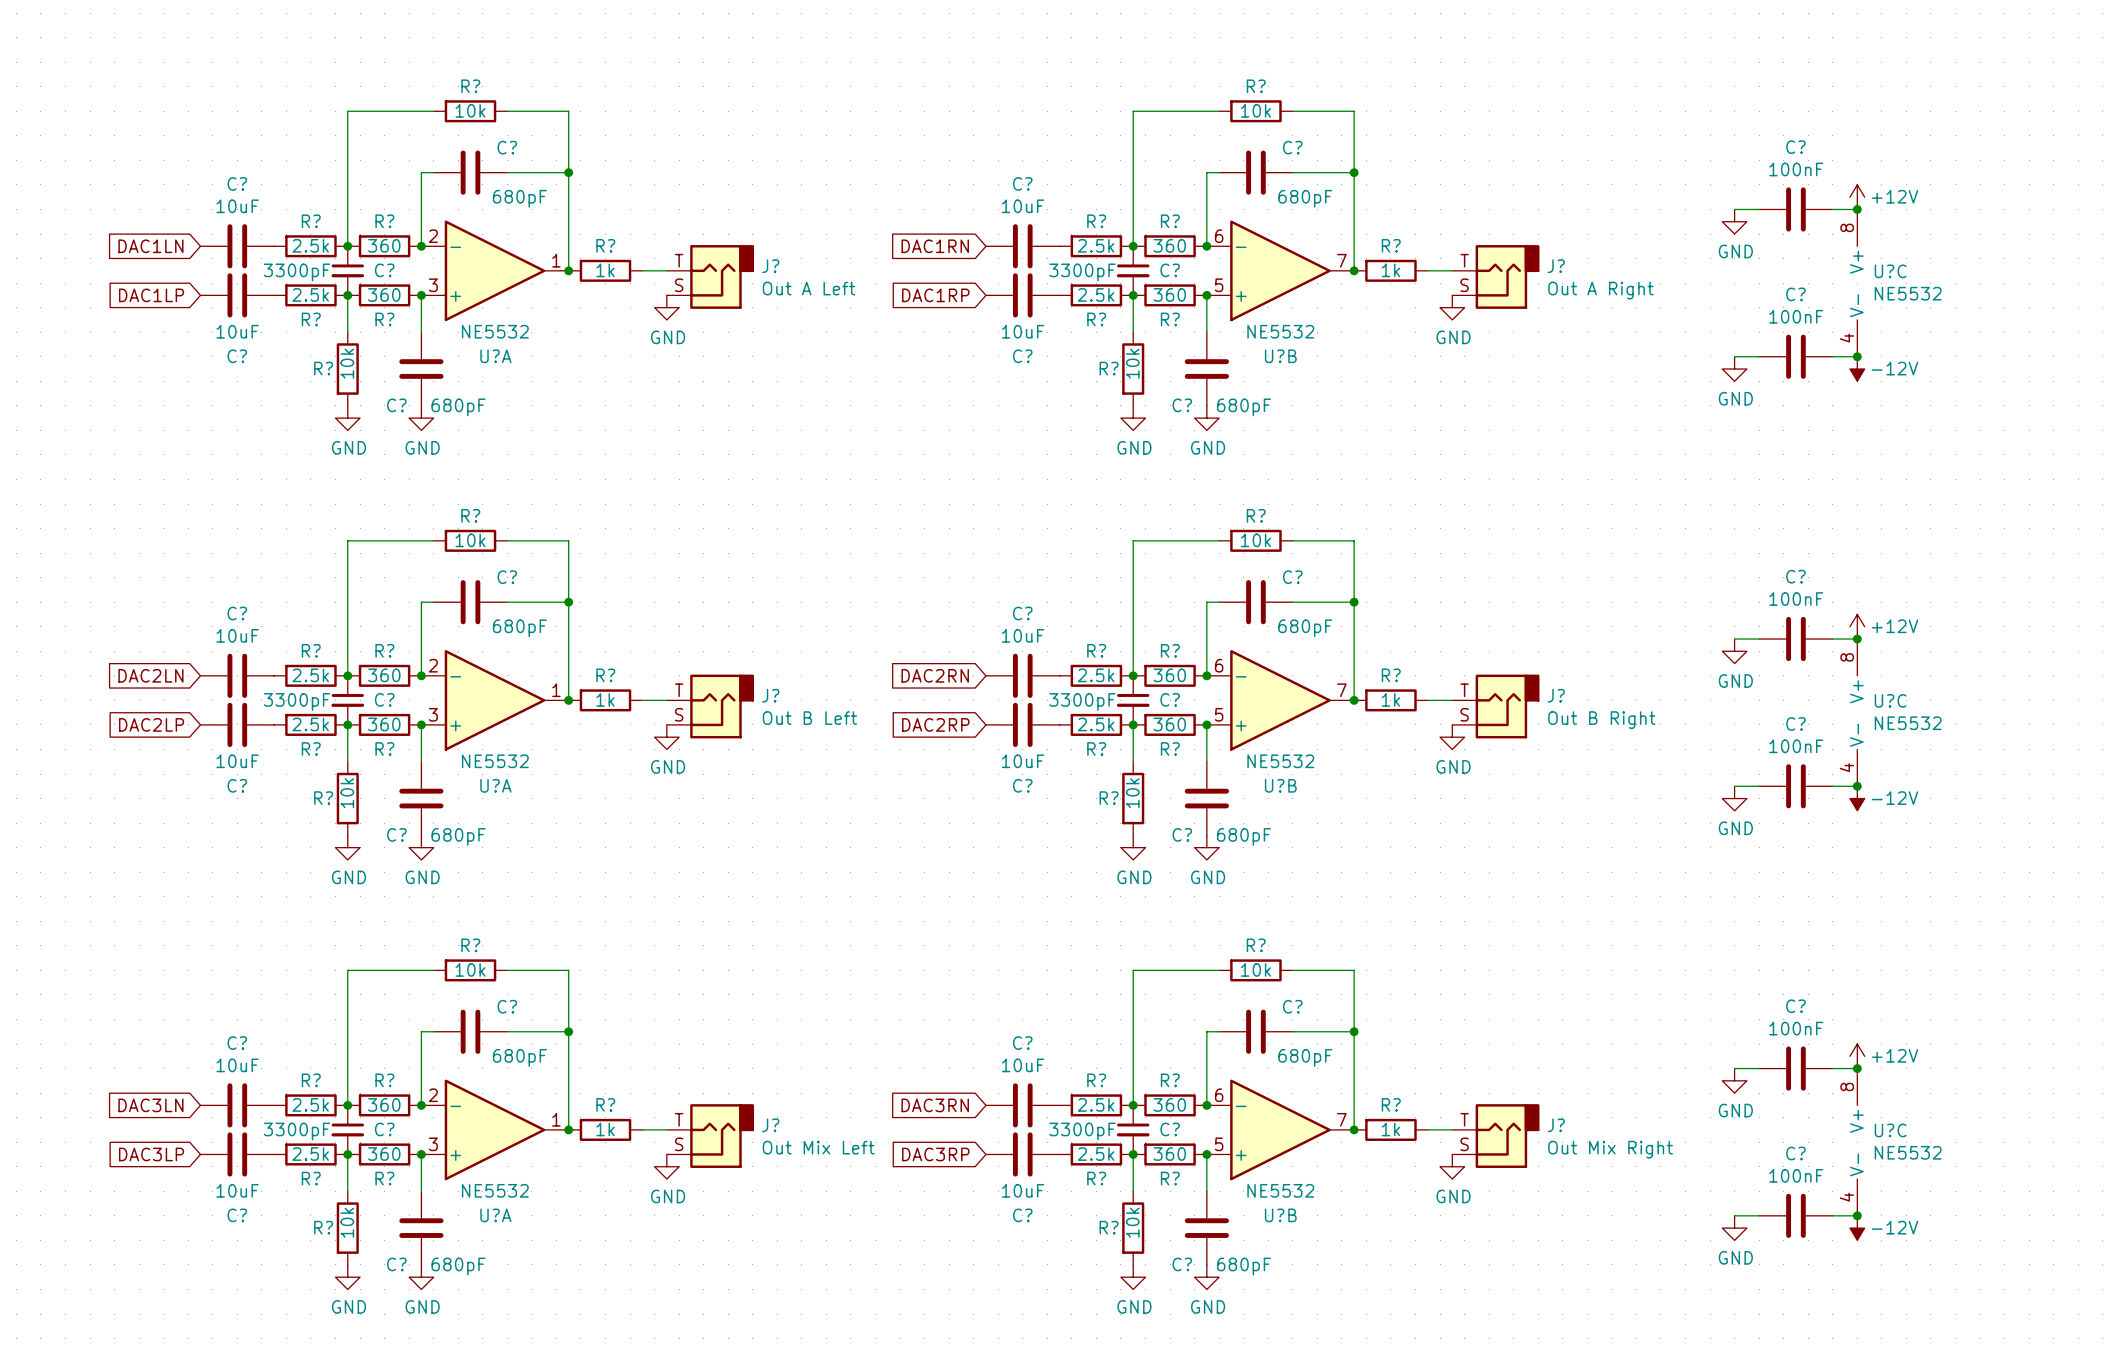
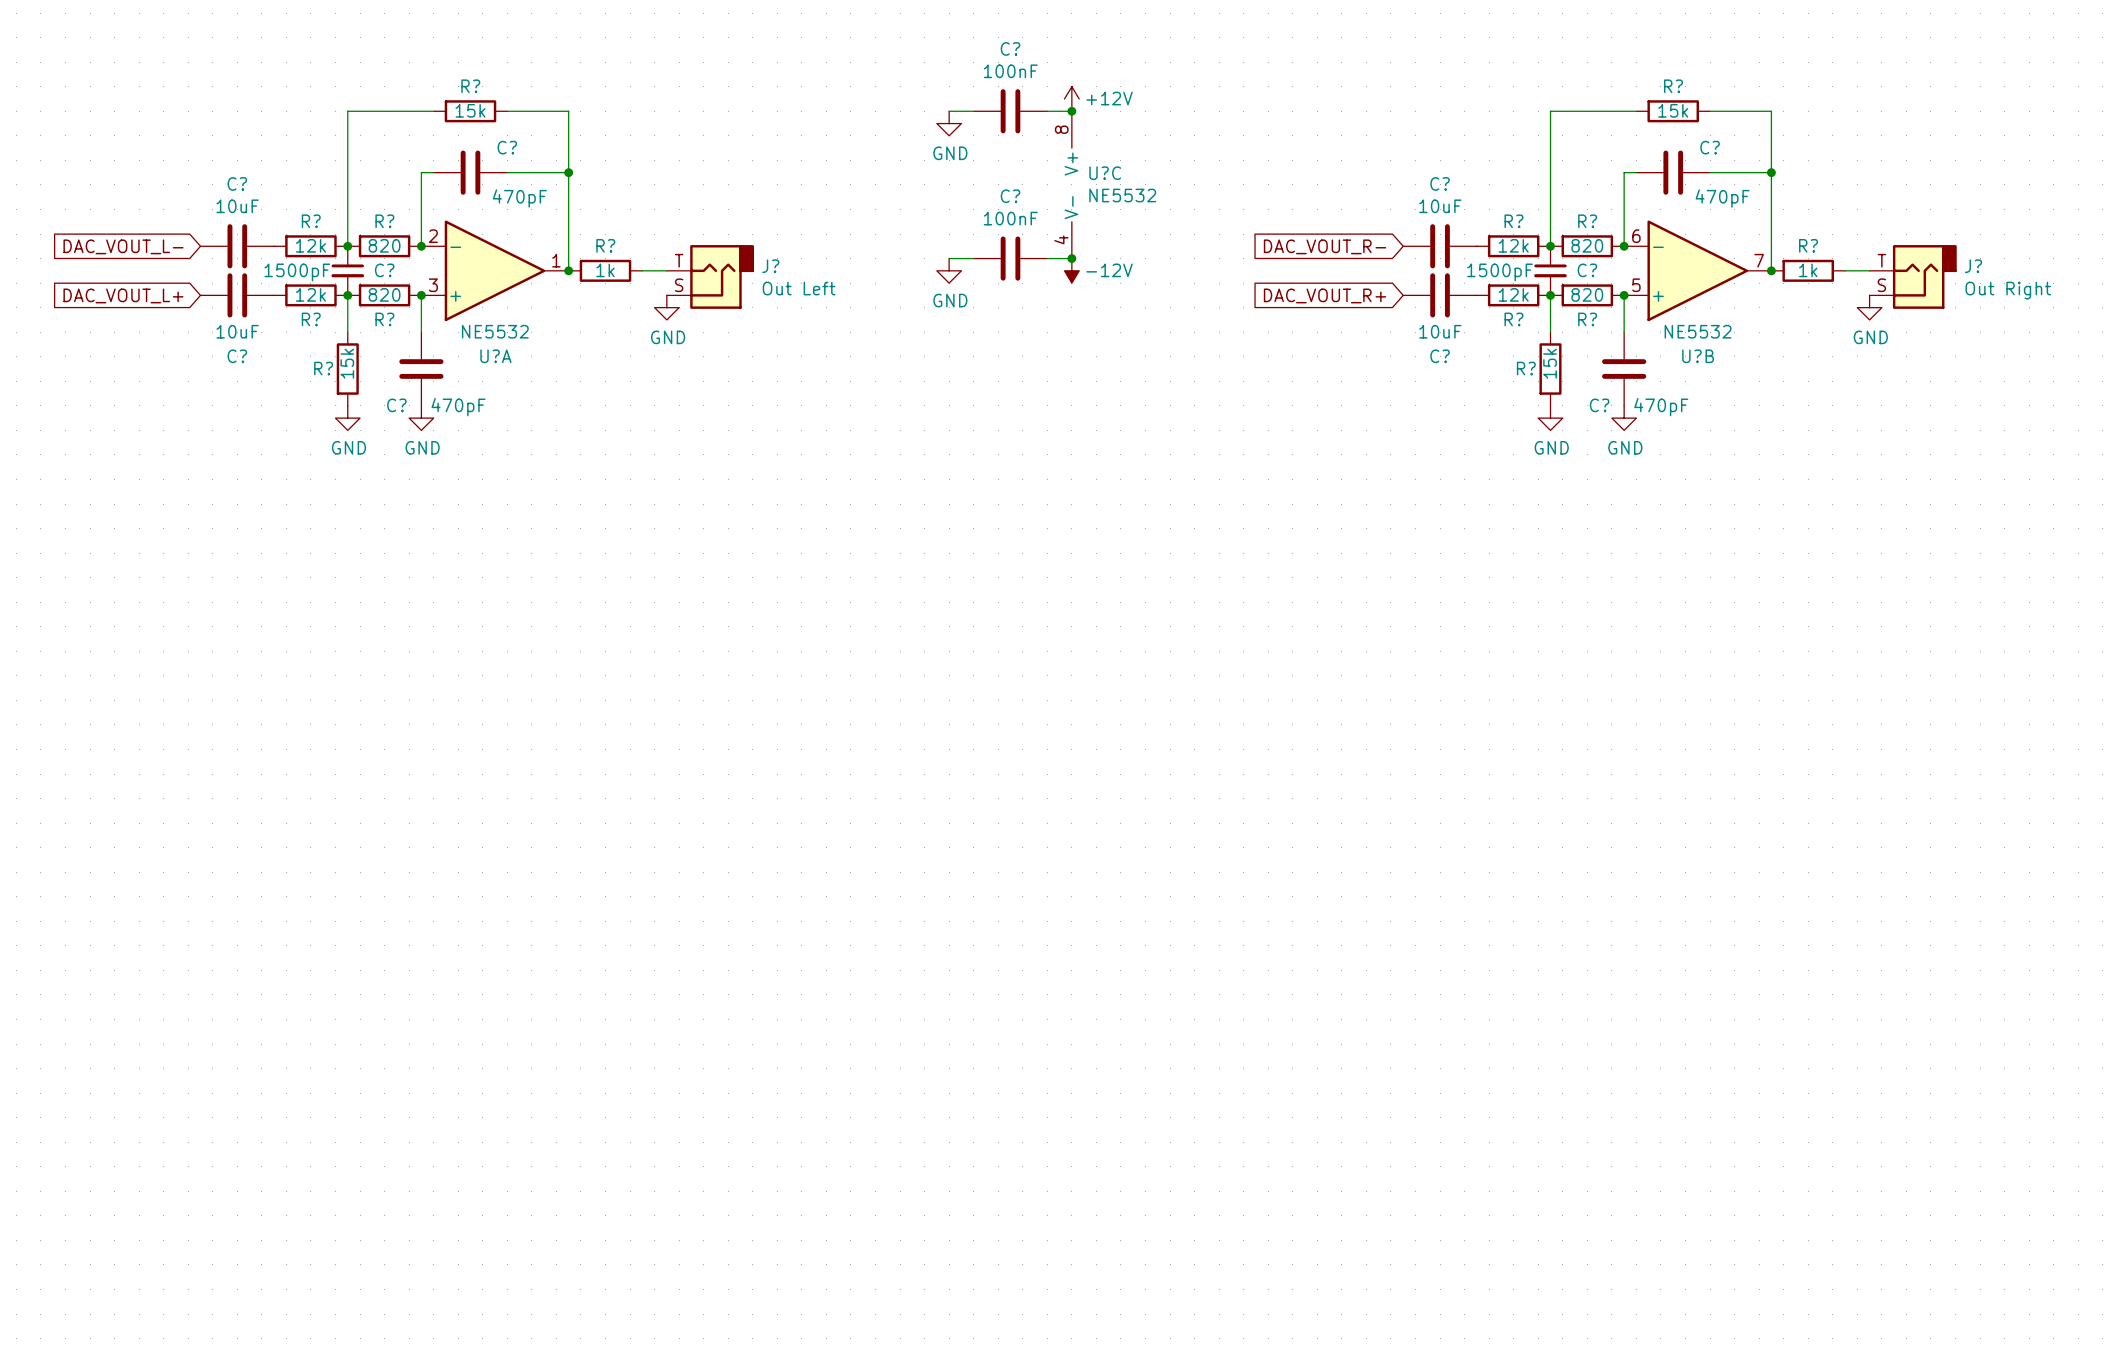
power symbol: none -> +12V (1071, 99)
R? value: 10k (470, 110) -> 15k (470, 110)
wire: none -> (949, 111) (973, 111)
C?: none -> 100nF (1010, 111)
wire: none -> (1047, 111) (1071, 111)
junction: none -> (1071, 111)
wire: (1219, 111) (1133, 111) (1133, 246) -> none
R?: 10k (1255, 111) -> none
wire: (1292, 111) (1354, 111) (1354, 270) -> none
wire: none -> (1636, 111) (1550, 111) (1550, 246)
R?: none -> 15k (1673, 111)
wire: none -> (1710, 111) (1771, 111) (1771, 270)
power symbol: none -> GND (949, 123)
wire: (1219, 172) (1206, 172) (1206, 246) -> none
C?: 680pF (1255, 172) -> none
wire: (1292, 172) (1354, 172) -> none
junction: (1354, 172) -> none
wire: none -> (1636, 172) (1624, 172) (1624, 246)
C?: none -> 470pF (1673, 172)
wire: none -> (1710, 172) (1771, 172)
junction: none -> (1771, 172)
U?C: none -> NE5532 (1071, 184)
power symbol: +12V (1857, 197) -> none
C? value: 680pF (519, 198) -> 470pF (519, 198)
wire: (1734, 209) (1759, 209) -> none
C?: 100nF (1795, 209) -> none
wire: (1832, 209) (1857, 209) -> (1845, 270) (1869, 270)
junction: (1857, 209) -> none
power symbol: GND (1734, 221) -> none
R? value: 2.5k (310, 245) -> 12k (310, 245)
R? value: 360 (384, 245) -> 820 (384, 245)
global label: DAC1LN (150, 246) -> DAC_VOUT_L- (123, 246)
global label: DAC1RN (935, 246) -> none
C?: 10uF (1022, 246) -> none
R?: 2.5k (1096, 246) -> none
junction: (1133, 246) -> none
R?: 360 (1170, 246) -> none
junction: (1206, 246) -> none
global label: none -> DAC_VOUT_R- (1325, 246)
C?: none -> 10uF (1440, 246)
R?: none -> 12k (1513, 246)
junction: none -> (1550, 246)
R?: none -> 820 (1587, 246)
junction: none -> (1624, 246)
C?: none -> 100nF (1010, 258)
wire: none -> (1047, 258) (1071, 258)
junction: none -> (1071, 258)
power symbol: none -> GND (949, 270)
power symbol: none -> -12V (1071, 270)
C?: 3300pF (1133, 270) -> none
U?B: NE5532 (1280, 270) -> none
junction: (1354, 270) -> none
R?: 1k (1390, 270) -> none
wire: (1427, 270) (1452, 270) -> none
C?: none -> 1500pF (1550, 270)
U?B: none -> NE5532 (1697, 270)
junction: none -> (1771, 270)
R?: none -> 1k (1808, 270)
C? value: 3300pF (297, 272) -> 1500pF (297, 272)
J?: Out A Right (1495, 276) -> none
J?: none -> Out Right (1913, 276)
U?C: NE5532 (1857, 283) -> none
J? value: Out A Left (809, 288) -> Out Left (799, 288)
R? value: 2.5k (310, 294) -> 12k (310, 294)
R? value: 360 (384, 294) -> 820 (384, 294)
global label: DAC1LP (151, 295) -> DAC_VOUT_L+ (123, 295)
global label: DAC1RP (935, 295) -> none
C?: 10uF (1022, 295) -> none
R?: 2.5k (1096, 295) -> none
wire: (1133, 295) (1133, 332) -> none
junction: (1133, 295) -> none
R?: 360 (1170, 295) -> none
wire: (1206, 295) (1206, 332) -> none
junction: (1206, 295) -> none
global label: none -> DAC_VOUT_R+ (1325, 295)
C?: none -> 10uF (1440, 295)
R?: none -> 12k (1513, 295)
wire: none -> (1550, 295) (1550, 332)
junction: none -> (1550, 295)
R?: none -> 820 (1587, 295)
wire: none -> (1624, 295) (1624, 332)
junction: none -> (1624, 295)
power symbol: GND (1452, 307) -> none
power symbol: none -> GND (1869, 307)
wire: (1734, 356) (1759, 356) -> none
C?: 100nF (1795, 356) -> none
wire: (1832, 356) (1857, 356) -> none
junction: (1857, 356) -> none
R? value: 10k (347, 363) -> 15k (347, 363)
R?: 10k (1133, 369) -> none
C?: 680pF (1206, 369) -> none
R?: none -> 15k (1550, 369)
C?: none -> 470pF (1624, 369)
power symbol: GND (1734, 369) -> none
power symbol: -12V (1857, 369) -> none
C? value: 680pF (458, 407) -> 470pF (458, 407)
power symbol: GND (1133, 418) -> none
power symbol: GND (1206, 418) -> none
power symbol: none -> GND (1550, 418)
power symbol: none -> GND (1624, 418)
wire: (433, 540) (347, 540) (347, 675) -> none
R?: 10k (470, 540) -> none
wire: (507, 540) (568, 540) (568, 700) -> none
wire: (1219, 540) (1133, 540) (1133, 675) -> none
R?: 10k (1255, 540) -> none
wire: (1292, 540) (1354, 540) (1354, 700) -> none
wire: (433, 602) (421, 602) (421, 675) -> none
C?: 680pF (470, 602) -> none
wire: (507, 602) (568, 602) -> none
junction: (568, 602) -> none
wire: (1219, 602) (1206, 602) (1206, 675) -> none
C?: 680pF (1255, 602) -> none
wire: (1292, 602) (1354, 602) -> none
junction: (1354, 602) -> none
power symbol: +12V (1857, 626) -> none
wire: (1734, 639) (1759, 639) -> none
C?: 100nF (1795, 639) -> none
wire: (1832, 639) (1857, 639) -> none
junction: (1857, 639) -> none
power symbol: GND (1734, 651) -> none
global label: DAC2LN (150, 675) -> none
C?: 10uF (237, 675) -> none
R?: 2.5k (310, 675) -> none
junction: (347, 675) -> none
R?: 360 (384, 675) -> none
junction: (421, 675) -> none
global label: DAC2RN (935, 675) -> none
C?: 10uF (1022, 675) -> none
R?: 2.5k (1096, 675) -> none
junction: (1133, 675) -> none
R?: 360 (1170, 675) -> none
junction: (1206, 675) -> none
C?: 3300pF (347, 700) -> none
U?A: NE5532 (495, 700) -> none
junction: (568, 700) -> none
R?: 1k (605, 700) -> none
wire: (642, 700) (666, 700) -> none
C?: 3300pF (1133, 700) -> none
U?B: NE5532 (1280, 700) -> none
junction: (1354, 700) -> none
R?: 1k (1390, 700) -> none
wire: (1427, 700) (1452, 700) -> none
J?: Out B Left (710, 706) -> none
J?: Out B Right (1495, 706) -> none
U?C: NE5532 (1857, 712) -> none
global label: DAC2LP (151, 724) -> none
C?: 10uF (237, 724) -> none
R?: 2.5k (310, 724) -> none
wire: (347, 724) (347, 761) -> none
junction: (347, 724) -> none
R?: 360 (384, 724) -> none
wire: (421, 724) (421, 761) -> none
junction: (421, 724) -> none
global label: DAC2RP (935, 724) -> none
C?: 10uF (1022, 724) -> none
R?: 2.5k (1096, 724) -> none
wire: (1133, 724) (1133, 761) -> none
junction: (1133, 724) -> none
R?: 360 (1170, 724) -> none
wire: (1206, 724) (1206, 761) -> none
junction: (1206, 724) -> none
power symbol: GND (666, 737) -> none
power symbol: GND (1452, 737) -> none
wire: (1734, 786) (1759, 786) -> none
C?: 100nF (1795, 786) -> none
wire: (1832, 786) (1857, 786) -> none
junction: (1857, 786) -> none
R?: 10k (347, 798) -> none
C?: 680pF (421, 798) -> none
R?: 10k (1133, 798) -> none
C?: 680pF (1206, 798) -> none
power symbol: GND (1734, 798) -> none
power symbol: -12V (1857, 798) -> none
power symbol: GND (347, 847) -> none
power symbol: GND (421, 847) -> none
power symbol: GND (1133, 847) -> none
power symbol: GND (1206, 847) -> none
wire: (433, 970) (347, 970) (347, 1105) -> none
R?: 10k (470, 970) -> none
wire: (507, 970) (568, 970) (568, 1129) -> none
wire: (1219, 970) (1133, 970) (1133, 1105) -> none
R?: 10k (1255, 970) -> none
wire: (1292, 970) (1354, 970) (1354, 1129) -> none
wire: (433, 1031) (421, 1031) (421, 1105) -> none
C?: 680pF (470, 1031) -> none
wire: (507, 1031) (568, 1031) -> none
junction: (568, 1031) -> none
wire: (1219, 1031) (1206, 1031) (1206, 1105) -> none
C?: 680pF (1255, 1031) -> none
wire: (1292, 1031) (1354, 1031) -> none
junction: (1354, 1031) -> none
power symbol: +12V (1857, 1056) -> none
wire: (1734, 1068) (1759, 1068) -> none
C?: 100nF (1795, 1068) -> none
wire: (1832, 1068) (1857, 1068) -> none
junction: (1857, 1068) -> none
power symbol: GND (1734, 1080) -> none
global label: DAC3LN (150, 1105) -> none
C?: 10uF (237, 1105) -> none
R?: 2.5k (310, 1105) -> none
junction: (347, 1105) -> none
R?: 360 (384, 1105) -> none
junction: (421, 1105) -> none
global label: DAC3RN (935, 1105) -> none
C?: 10uF (1022, 1105) -> none
R?: 2.5k (1096, 1105) -> none
junction: (1133, 1105) -> none
R?: 360 (1170, 1105) -> none
junction: (1206, 1105) -> none
C?: 3300pF (347, 1129) -> none
U?A: NE5532 (495, 1129) -> none
junction: (568, 1129) -> none
R?: 1k (605, 1129) -> none
wire: (642, 1129) (666, 1129) -> none
C?: 3300pF (1133, 1129) -> none
U?B: NE5532 (1280, 1129) -> none
junction: (1354, 1129) -> none
R?: 1k (1390, 1129) -> none
wire: (1427, 1129) (1452, 1129) -> none
J?: Out Mix Left (710, 1136) -> none
J?: Out Mix Right (1495, 1136) -> none
U?C: NE5532 (1857, 1142) -> none
global label: DAC3LP (151, 1154) -> none
C?: 10uF (237, 1154) -> none
R?: 2.5k (310, 1154) -> none
wire: (347, 1154) (347, 1191) -> none
junction: (347, 1154) -> none
R?: 360 (384, 1154) -> none
wire: (421, 1154) (421, 1191) -> none
junction: (421, 1154) -> none
global label: DAC3RP (935, 1154) -> none
C?: 10uF (1022, 1154) -> none
R?: 2.5k (1096, 1154) -> none
wire: (1133, 1154) (1133, 1191) -> none
junction: (1133, 1154) -> none
R?: 360 (1170, 1154) -> none
wire: (1206, 1154) (1206, 1191) -> none
junction: (1206, 1154) -> none
power symbol: GND (666, 1166) -> none
power symbol: GND (1452, 1166) -> none
wire: (1734, 1215) (1759, 1215) -> none
C?: 100nF (1795, 1215) -> none
wire: (1832, 1215) (1857, 1215) -> none
junction: (1857, 1215) -> none
R?: 10k (347, 1228) -> none
C?: 680pF (421, 1228) -> none
R?: 10k (1133, 1228) -> none
C?: 680pF (1206, 1228) -> none
power symbol: GND (1734, 1228) -> none
power symbol: -12V (1857, 1228) -> none
power symbol: GND (347, 1277) -> none
power symbol: GND (421, 1277) -> none
power symbol: GND (1133, 1277) -> none
power symbol: GND (1206, 1277) -> none

